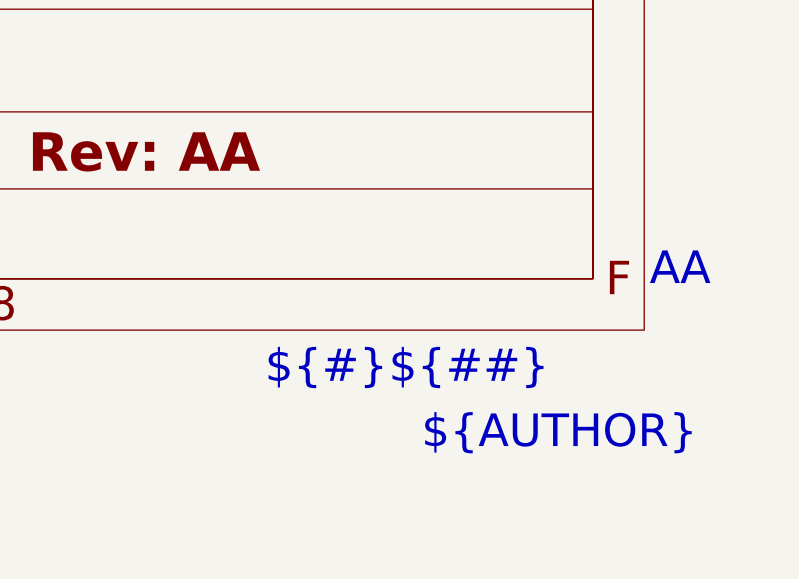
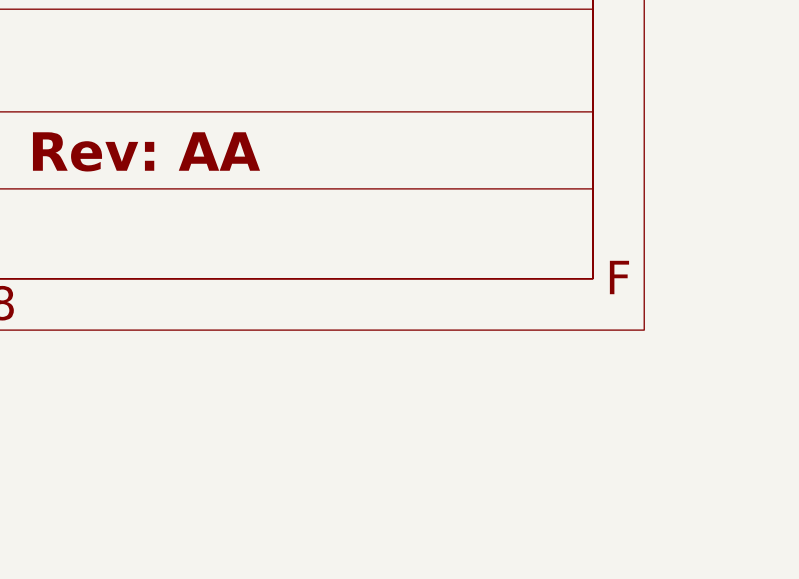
text: AA (680, 266) -> none
text: ${#} (325, 367) -> none
text: ${##} (468, 367) -> none
text: ${AUTHOR} (558, 432) -> none

